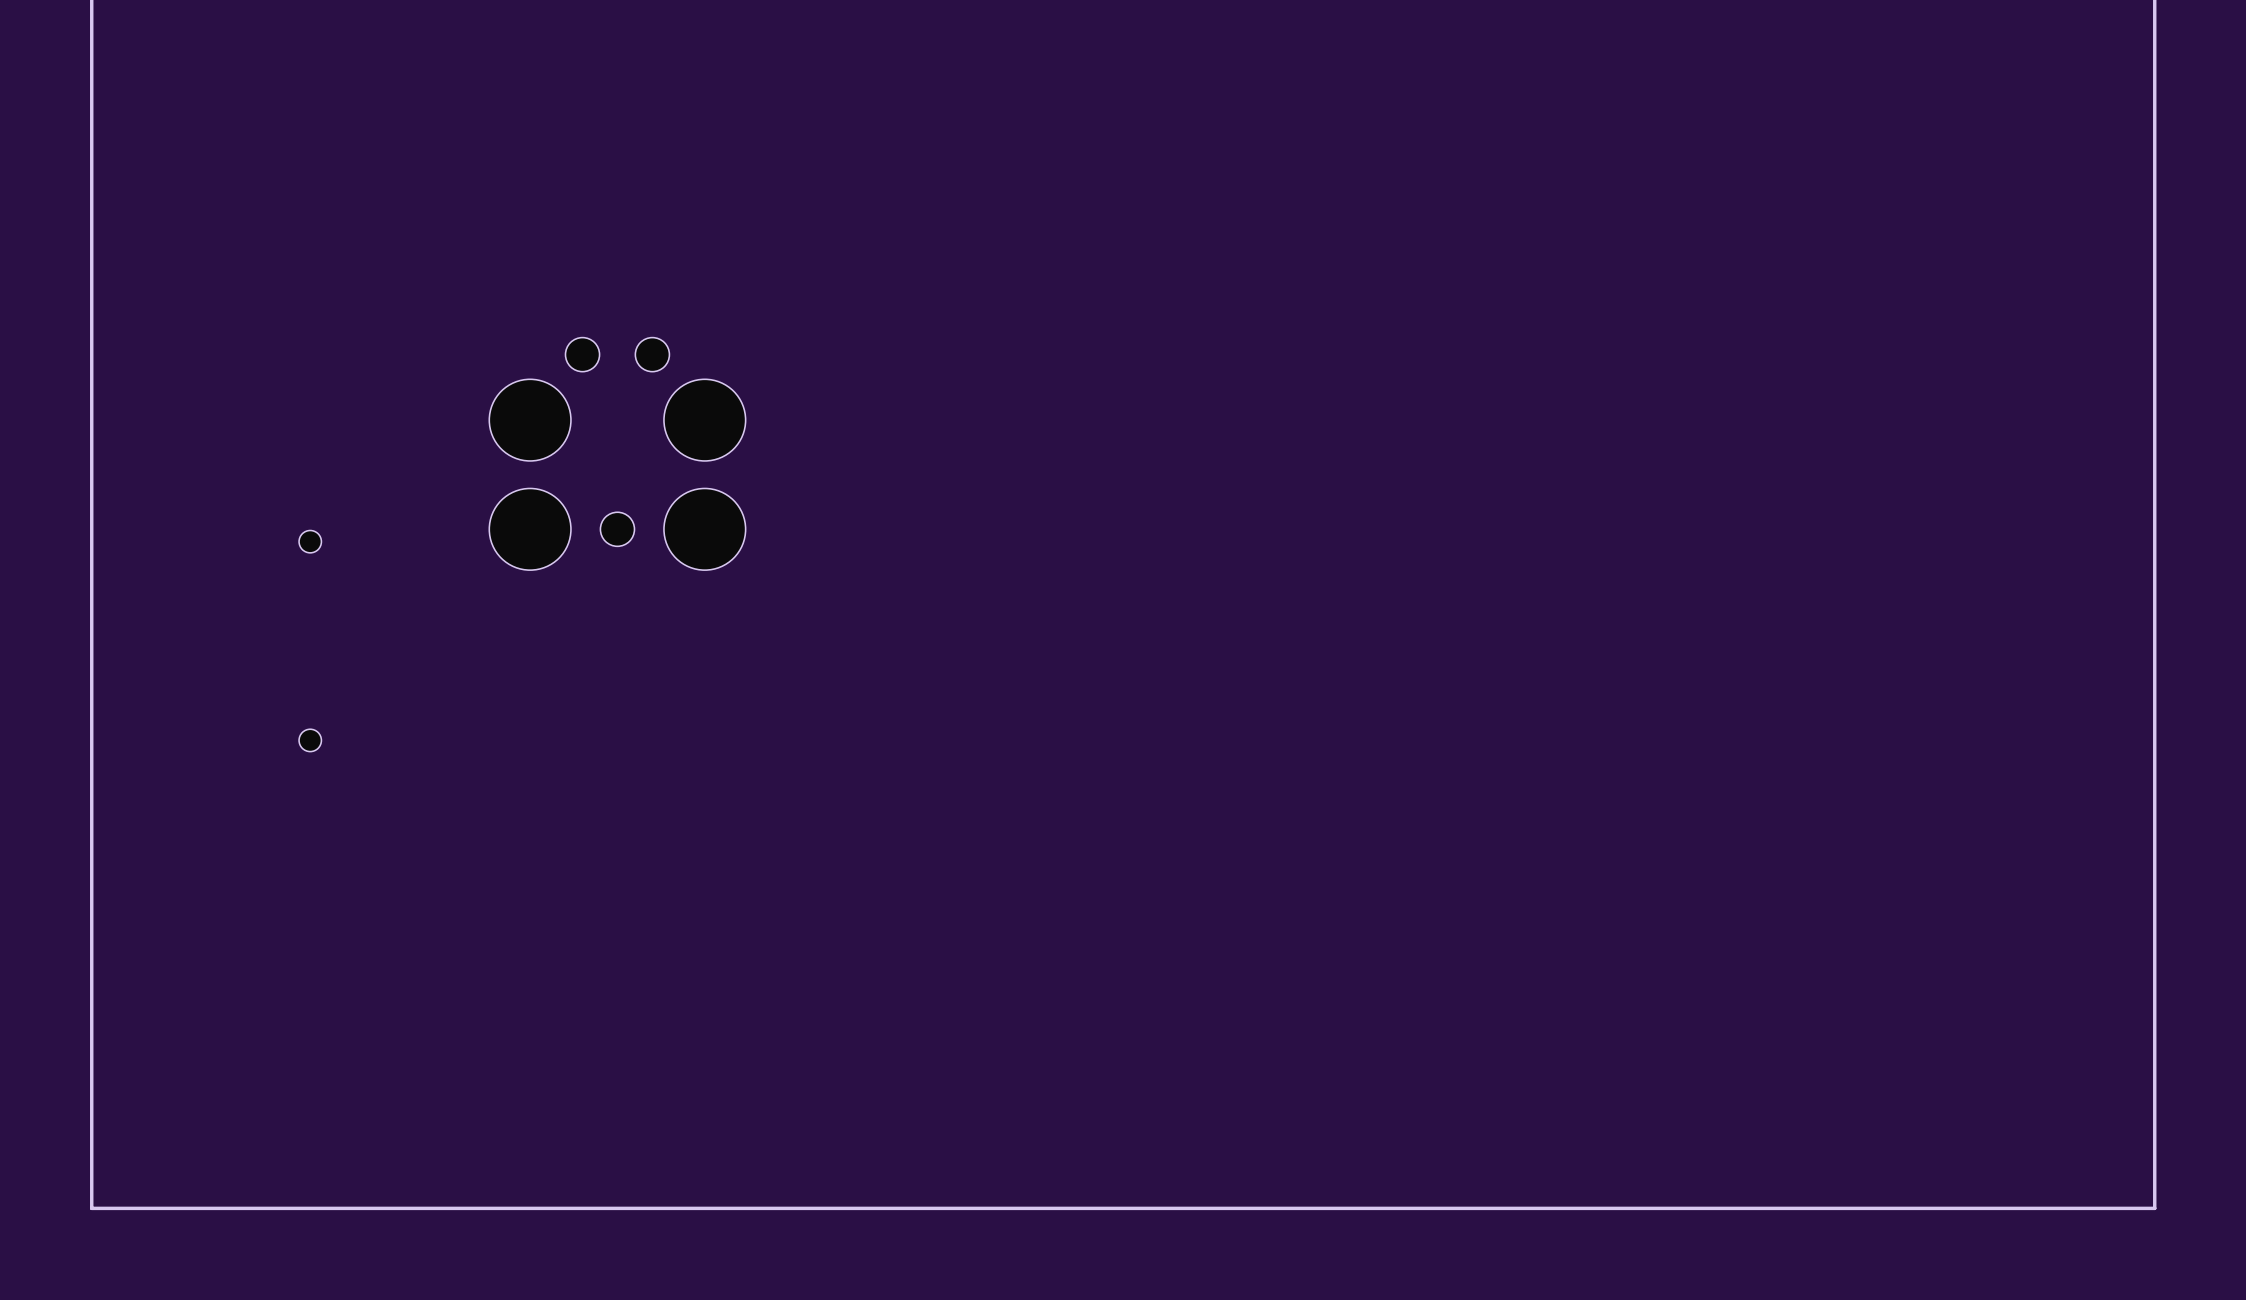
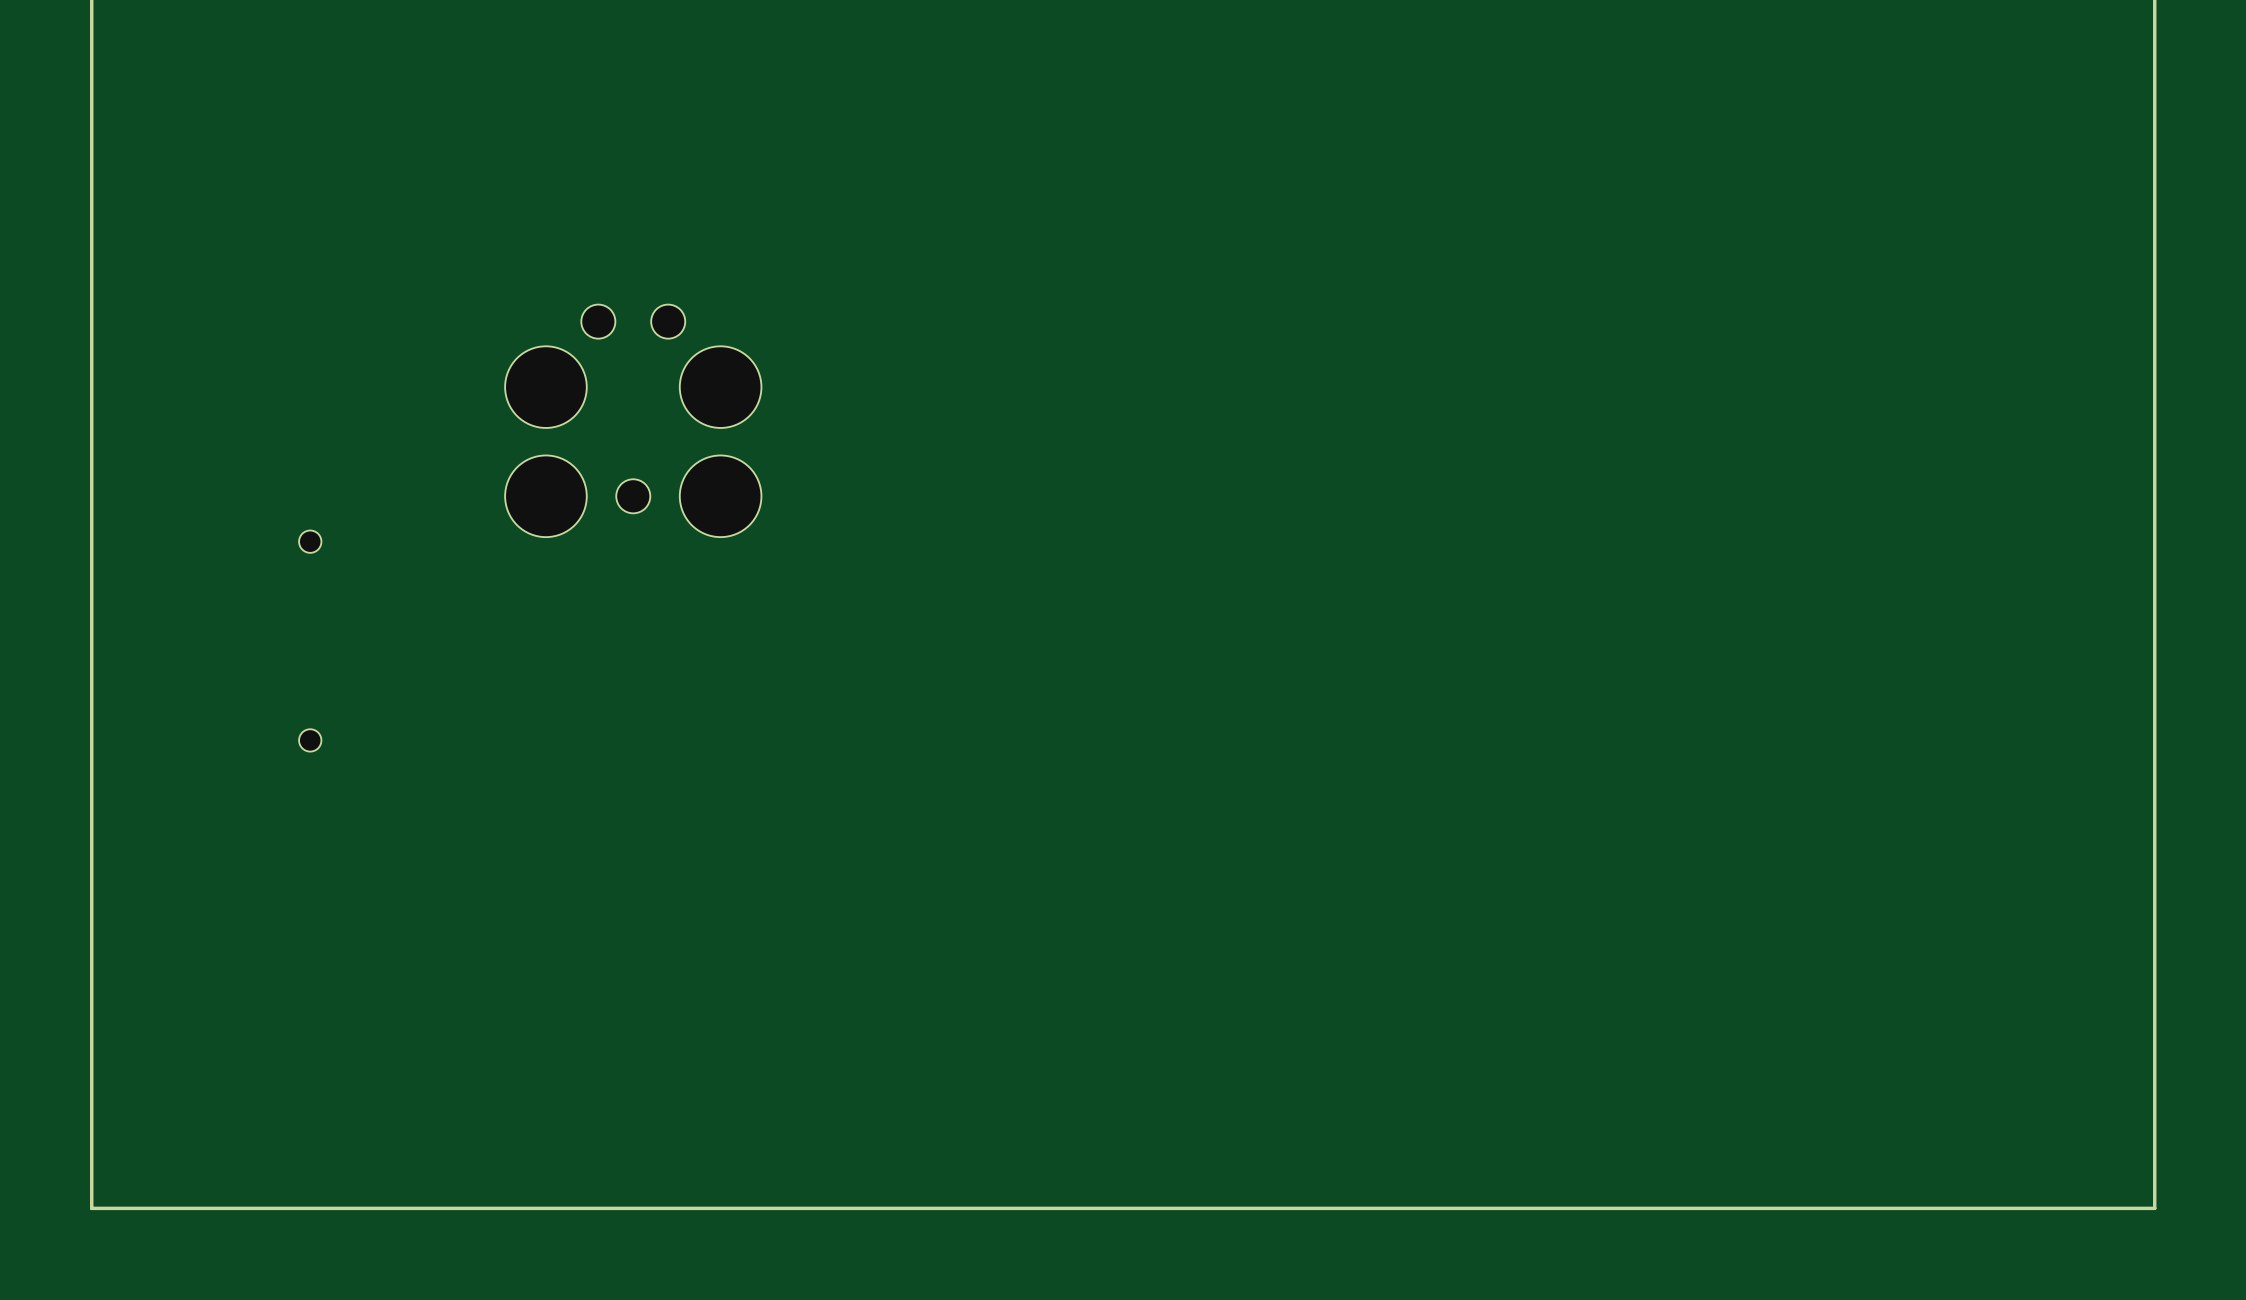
part position: (617, 453) -> (633, 420)

